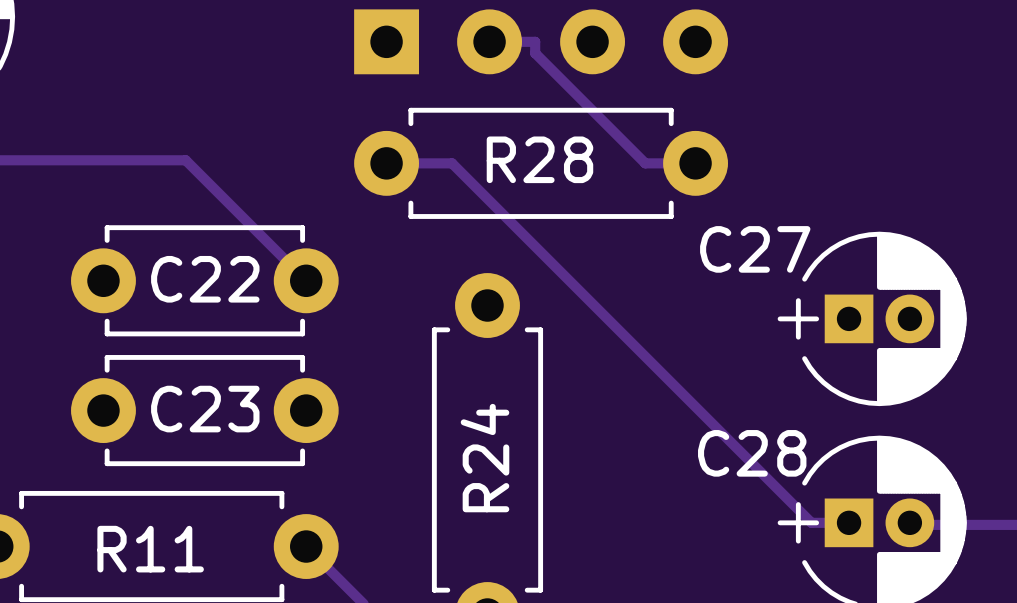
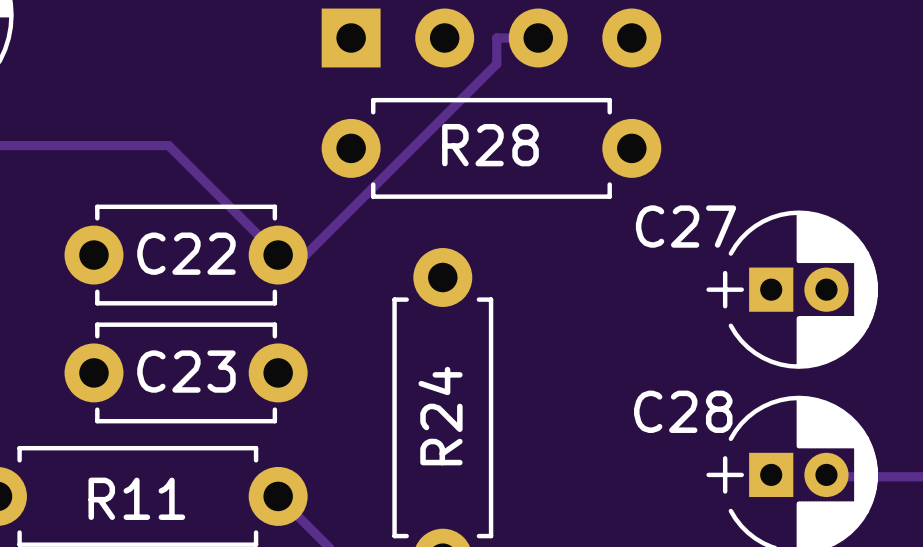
track: (489, 41) (535, 41) (535, 53) (645, 163) (695, 163) -> none
track: none -> (538, 38) (496, 38) (496, 63) (305, 255) (278, 255)
track: (386, 163) (452, 163) (811, 522) (849, 522) -> none

